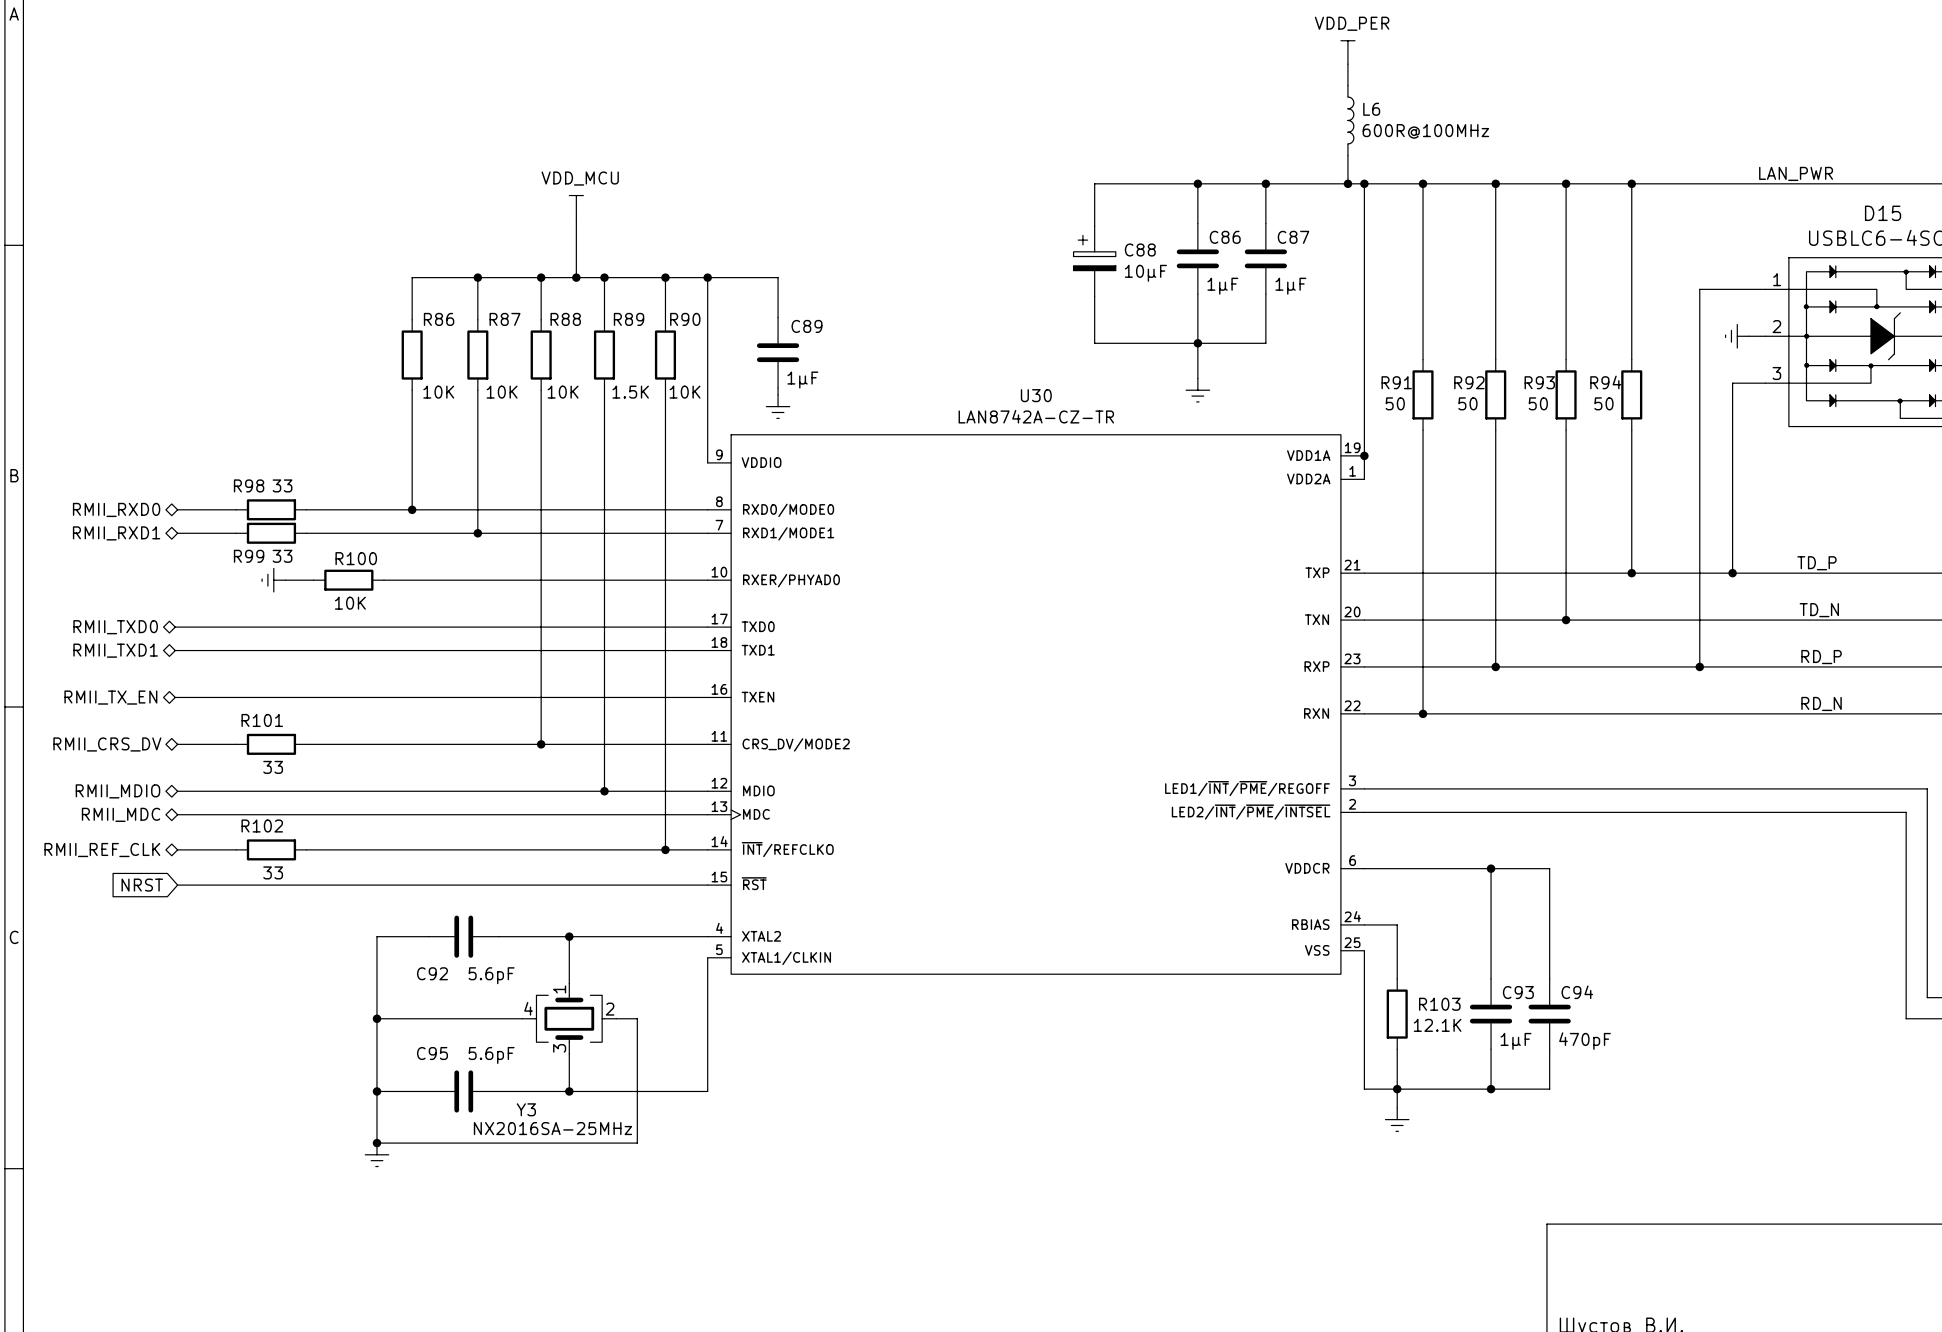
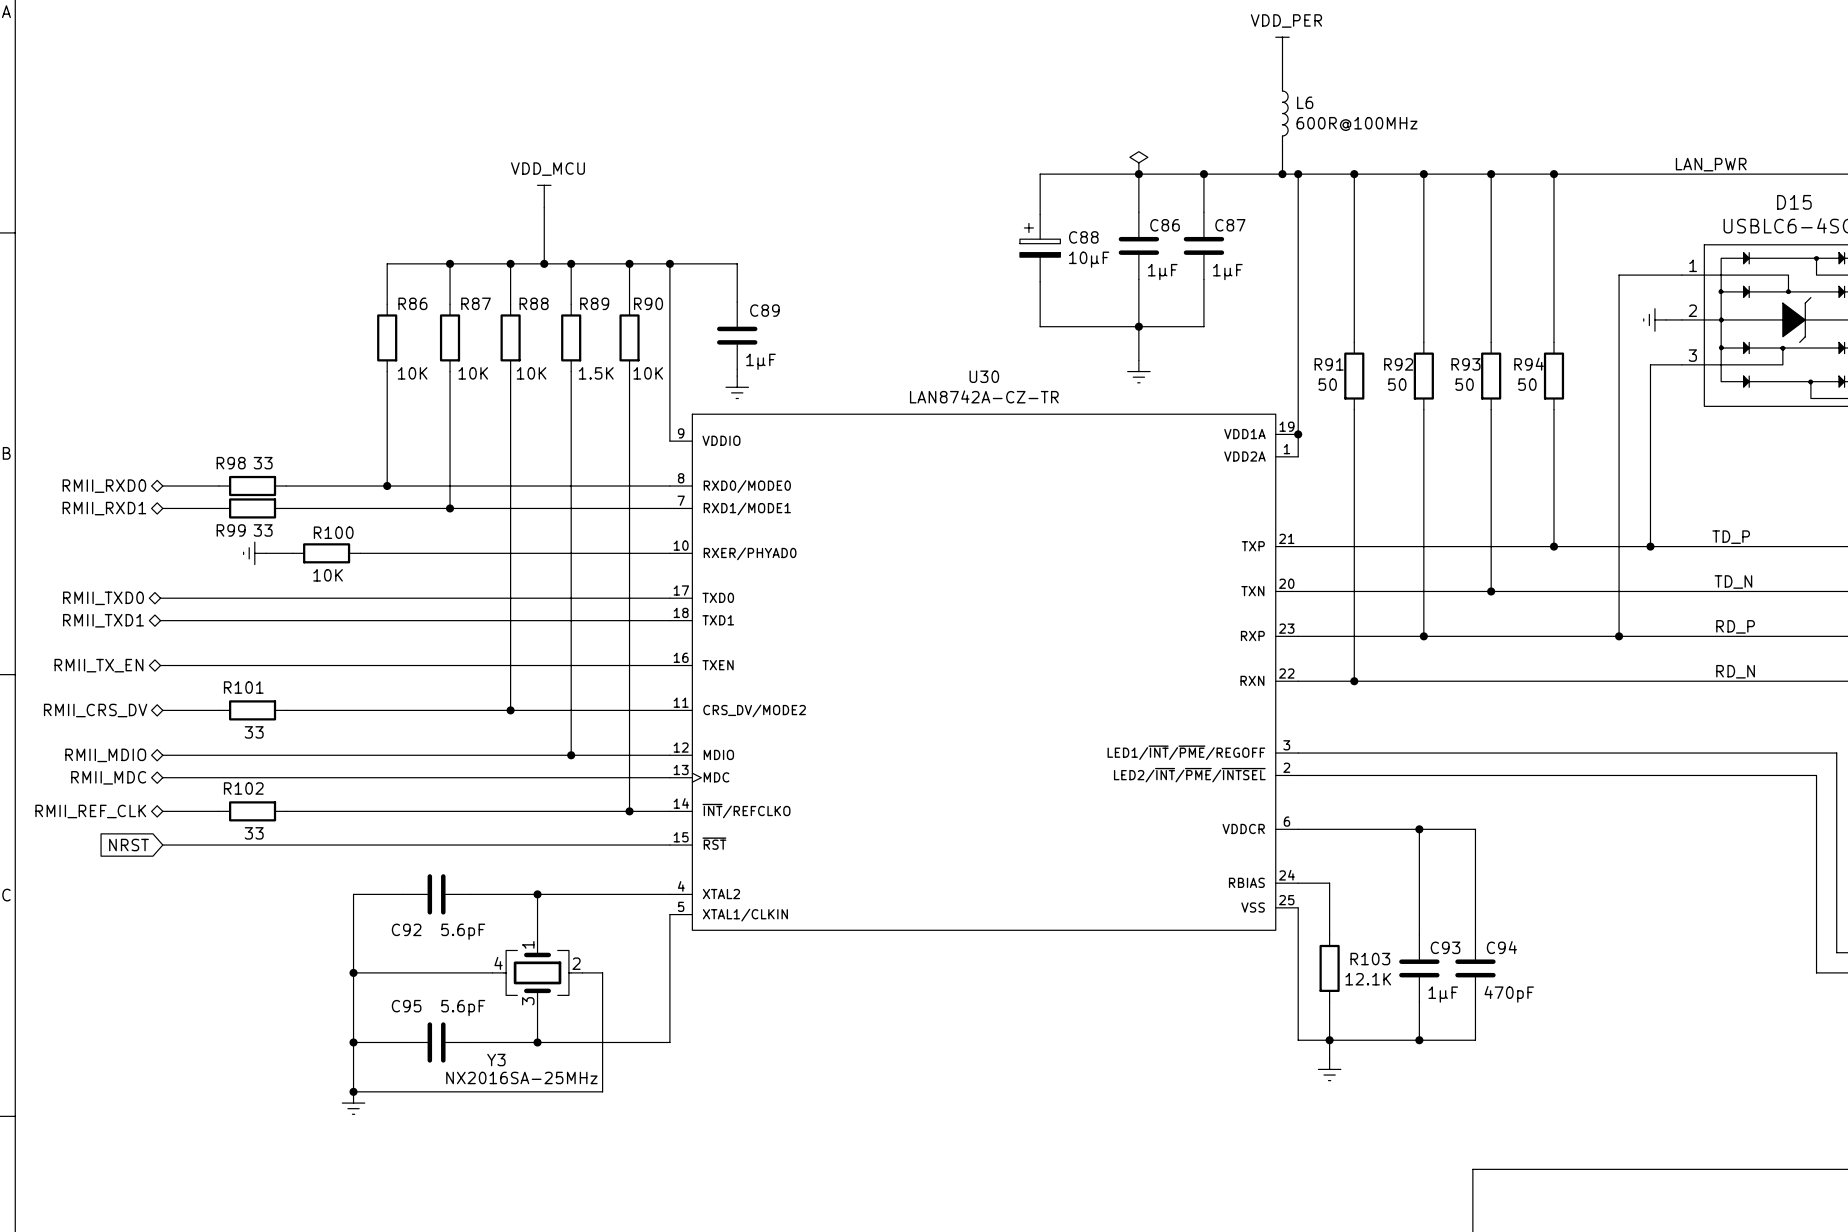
power symbol: none -> (1138, 162)

